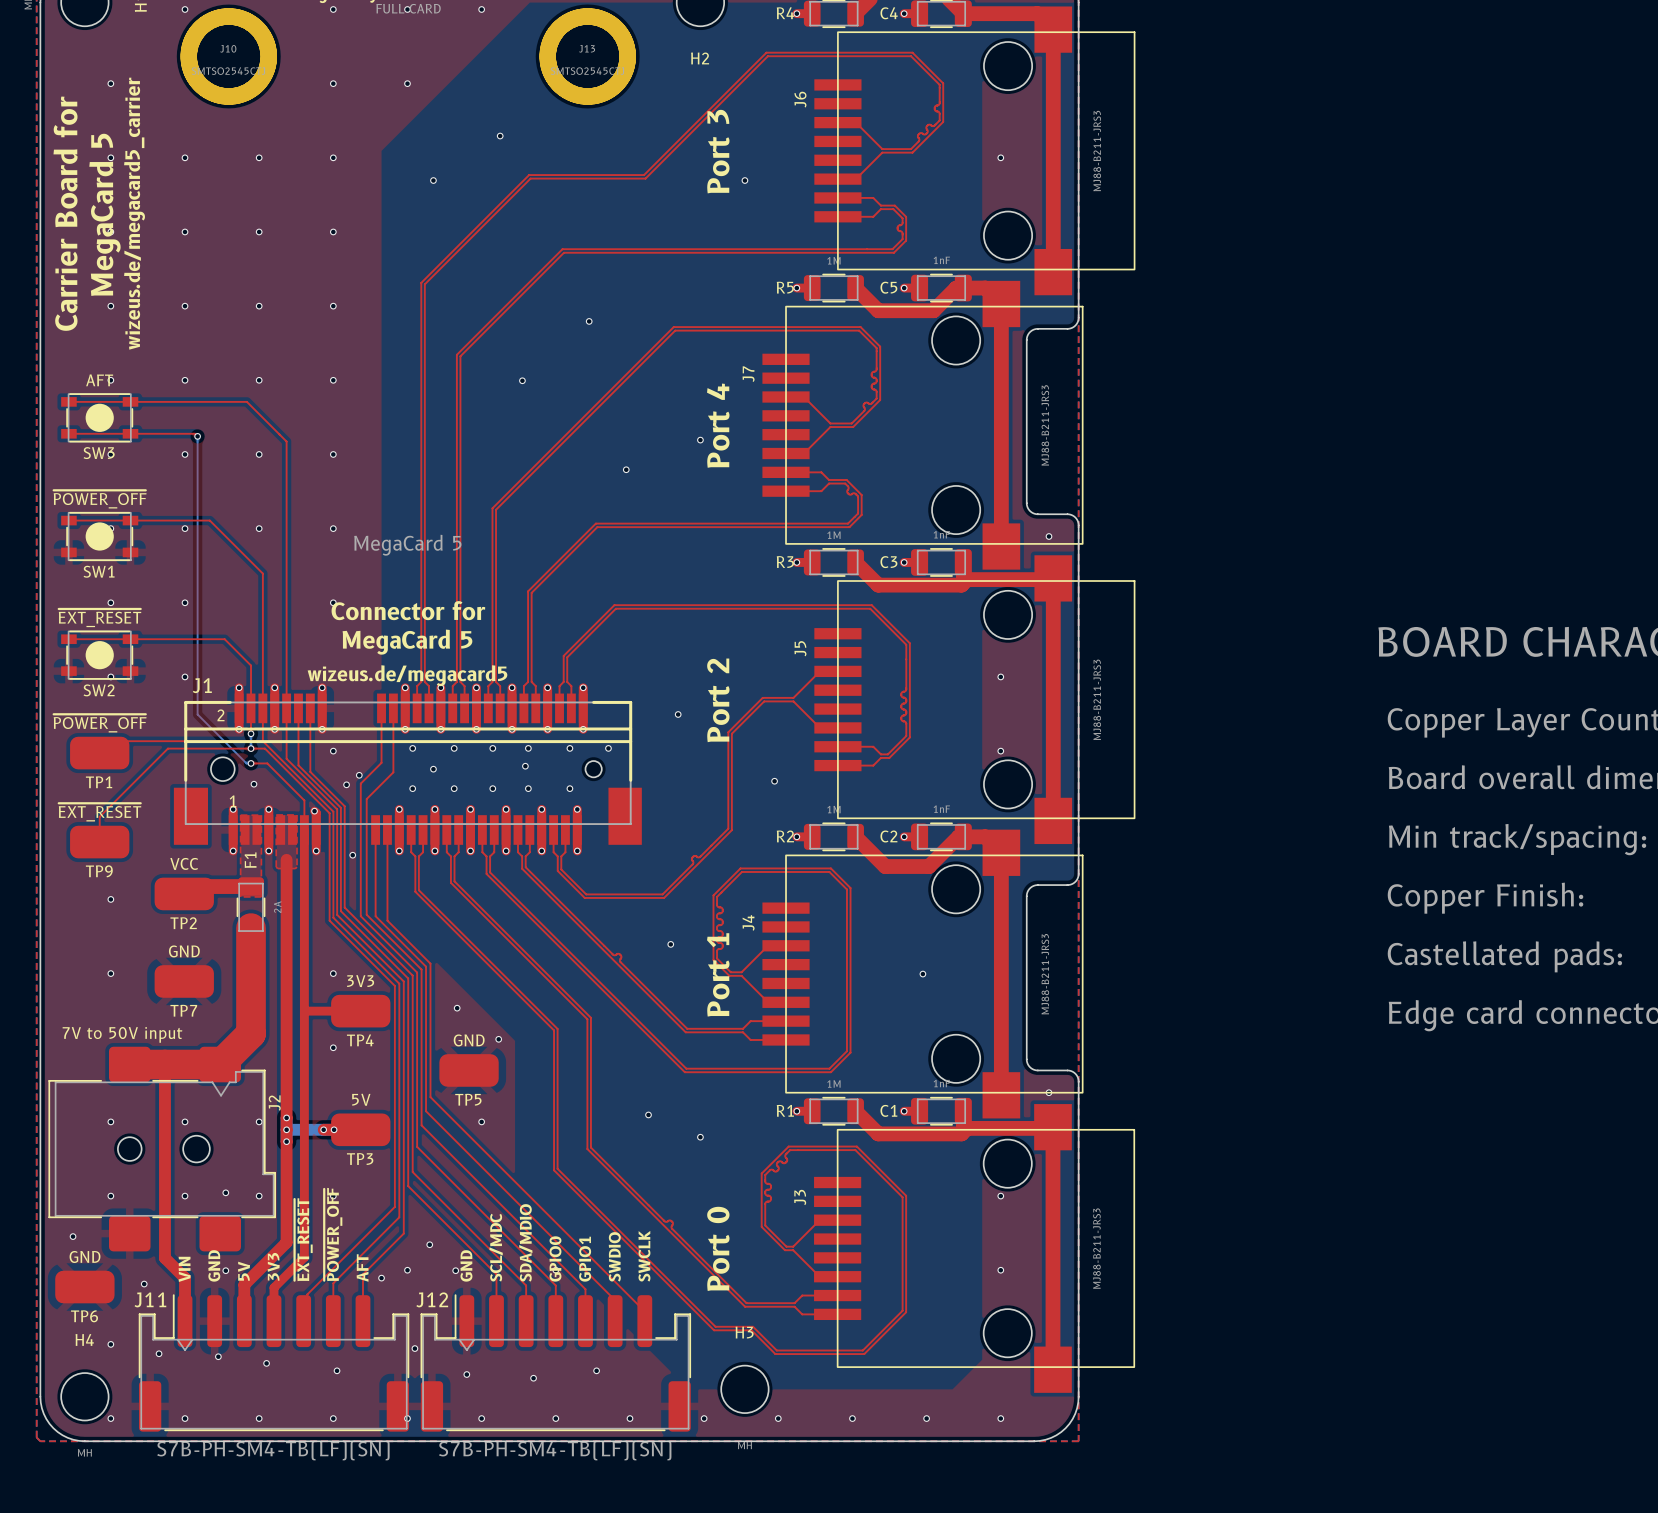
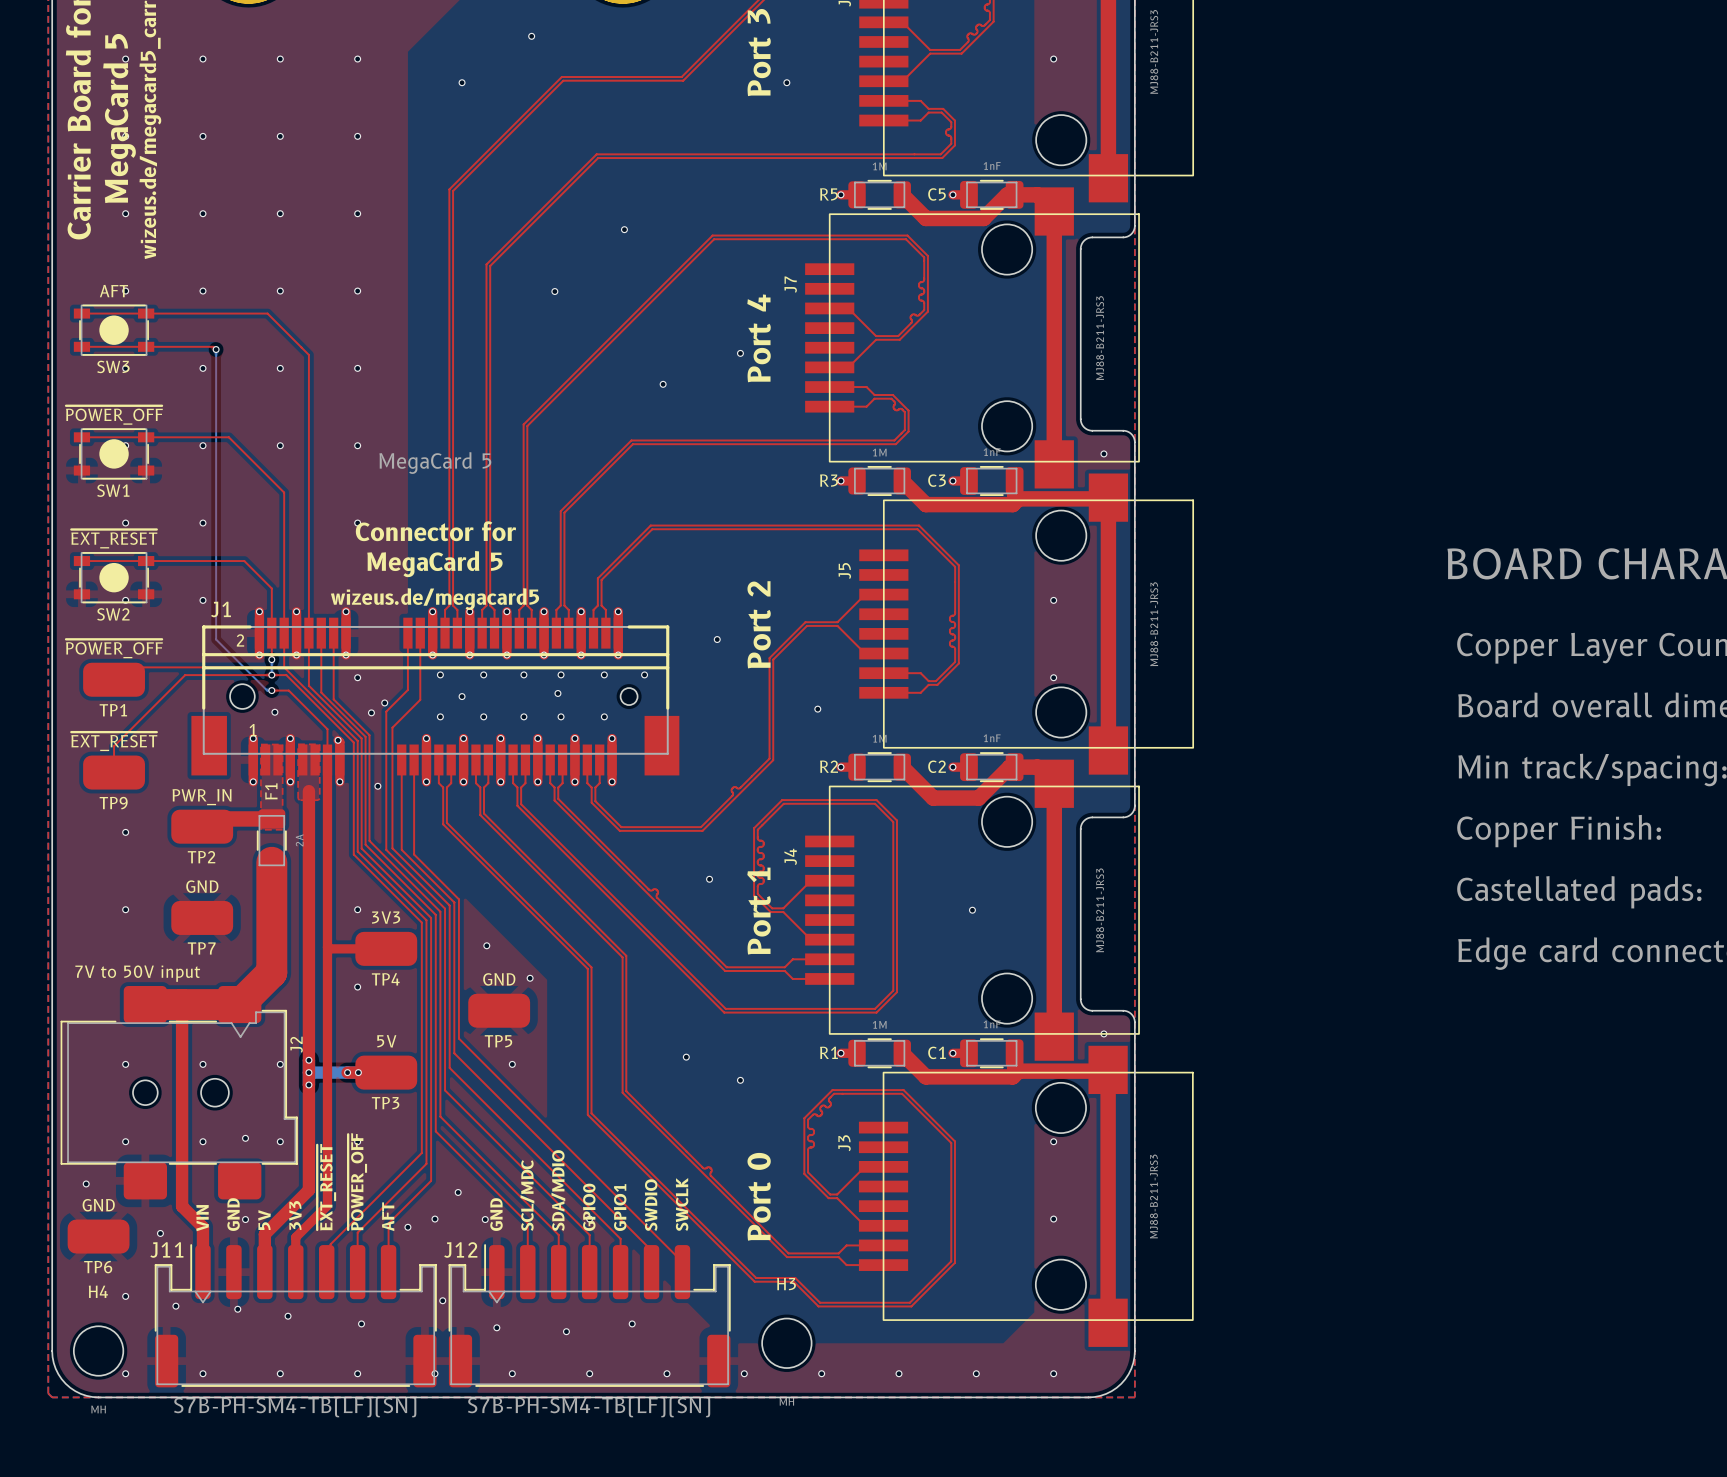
TP2 value: VCC (184, 863) -> PWR_IN (202, 797)

